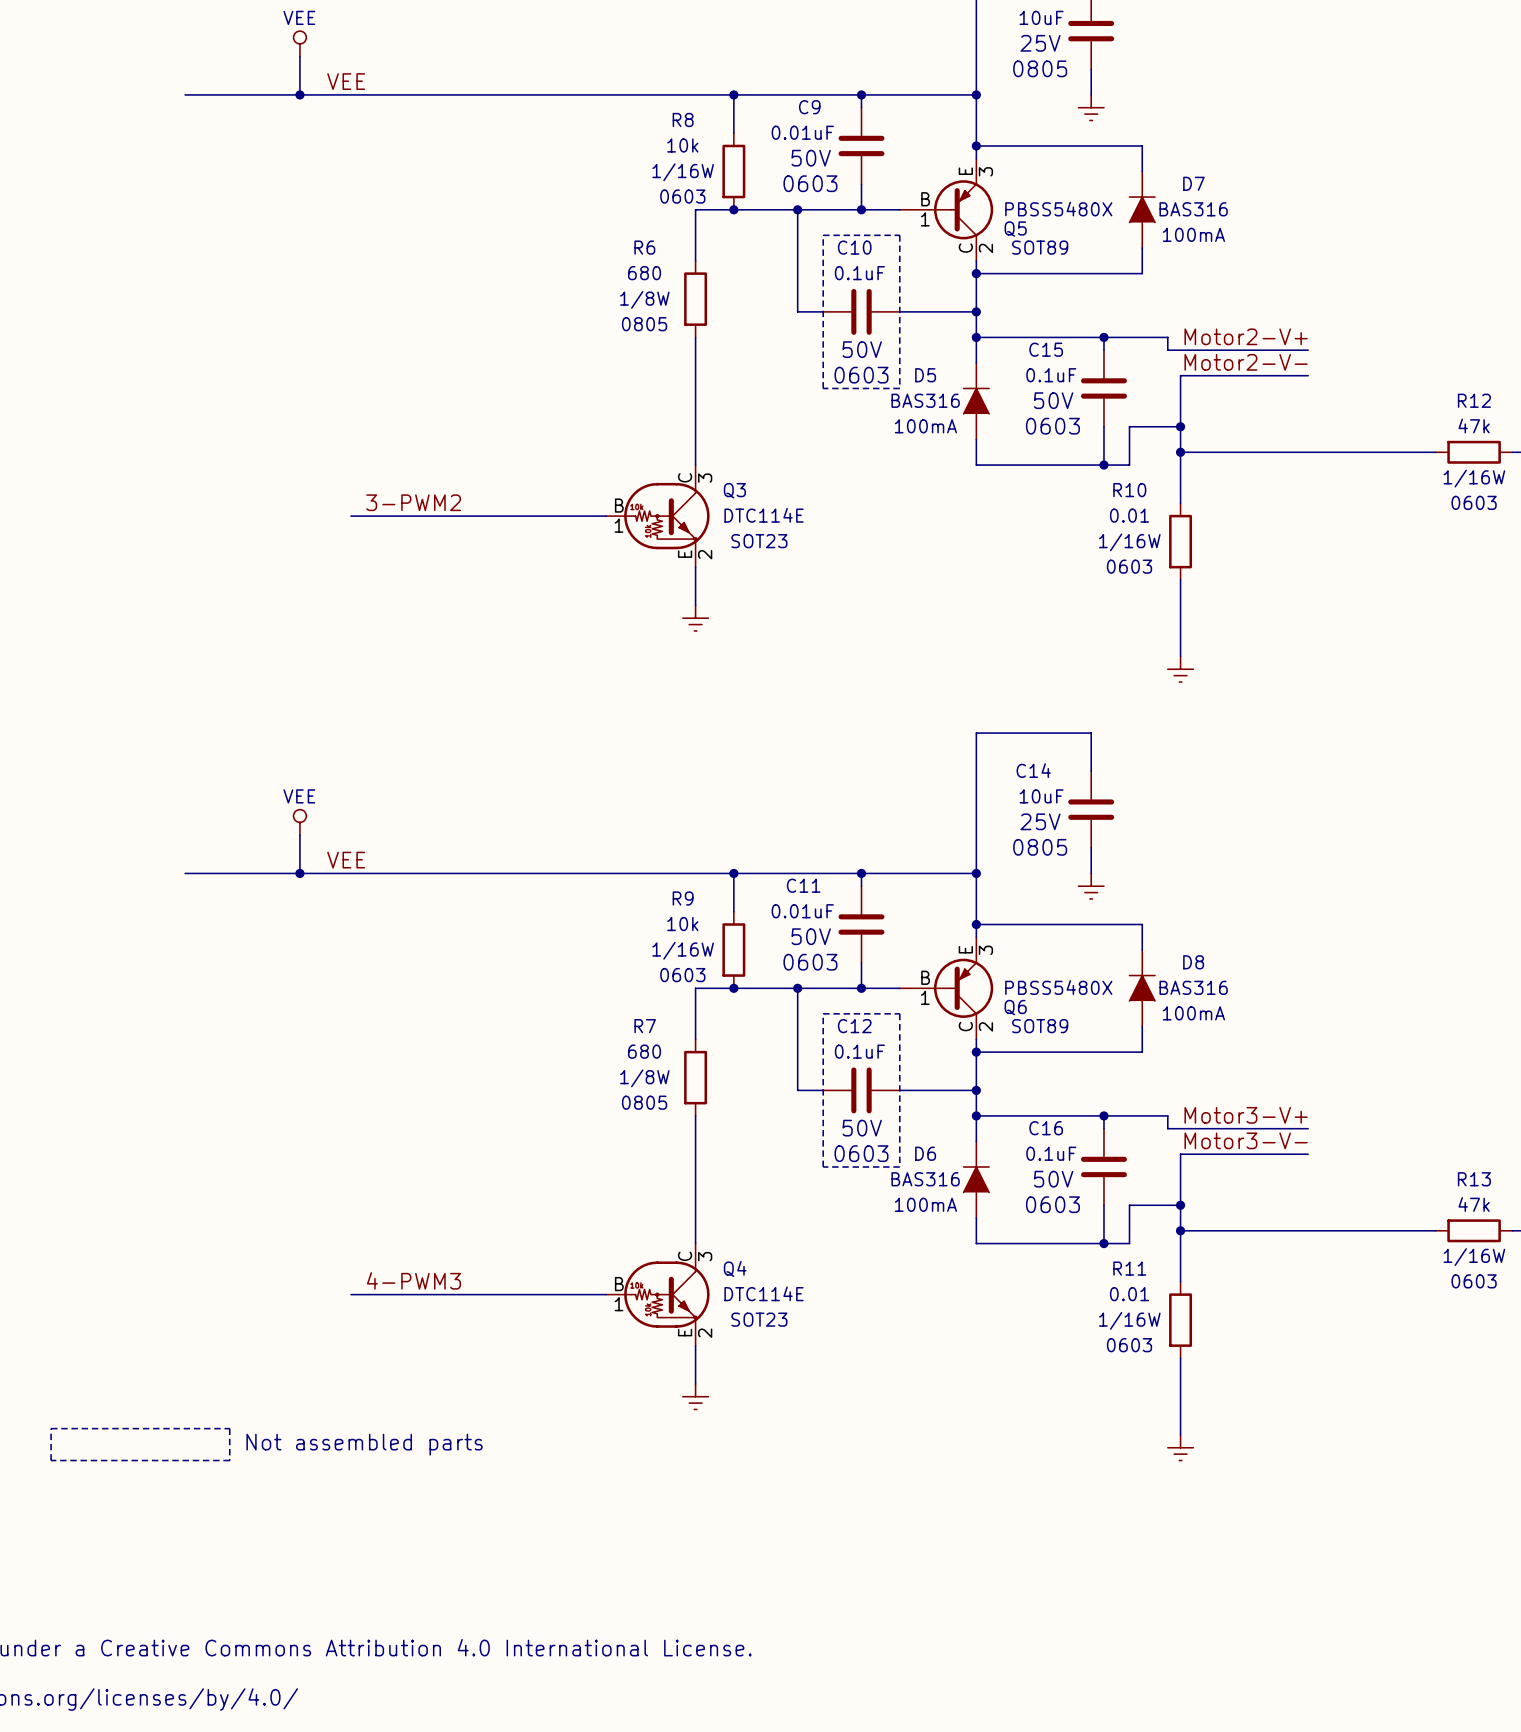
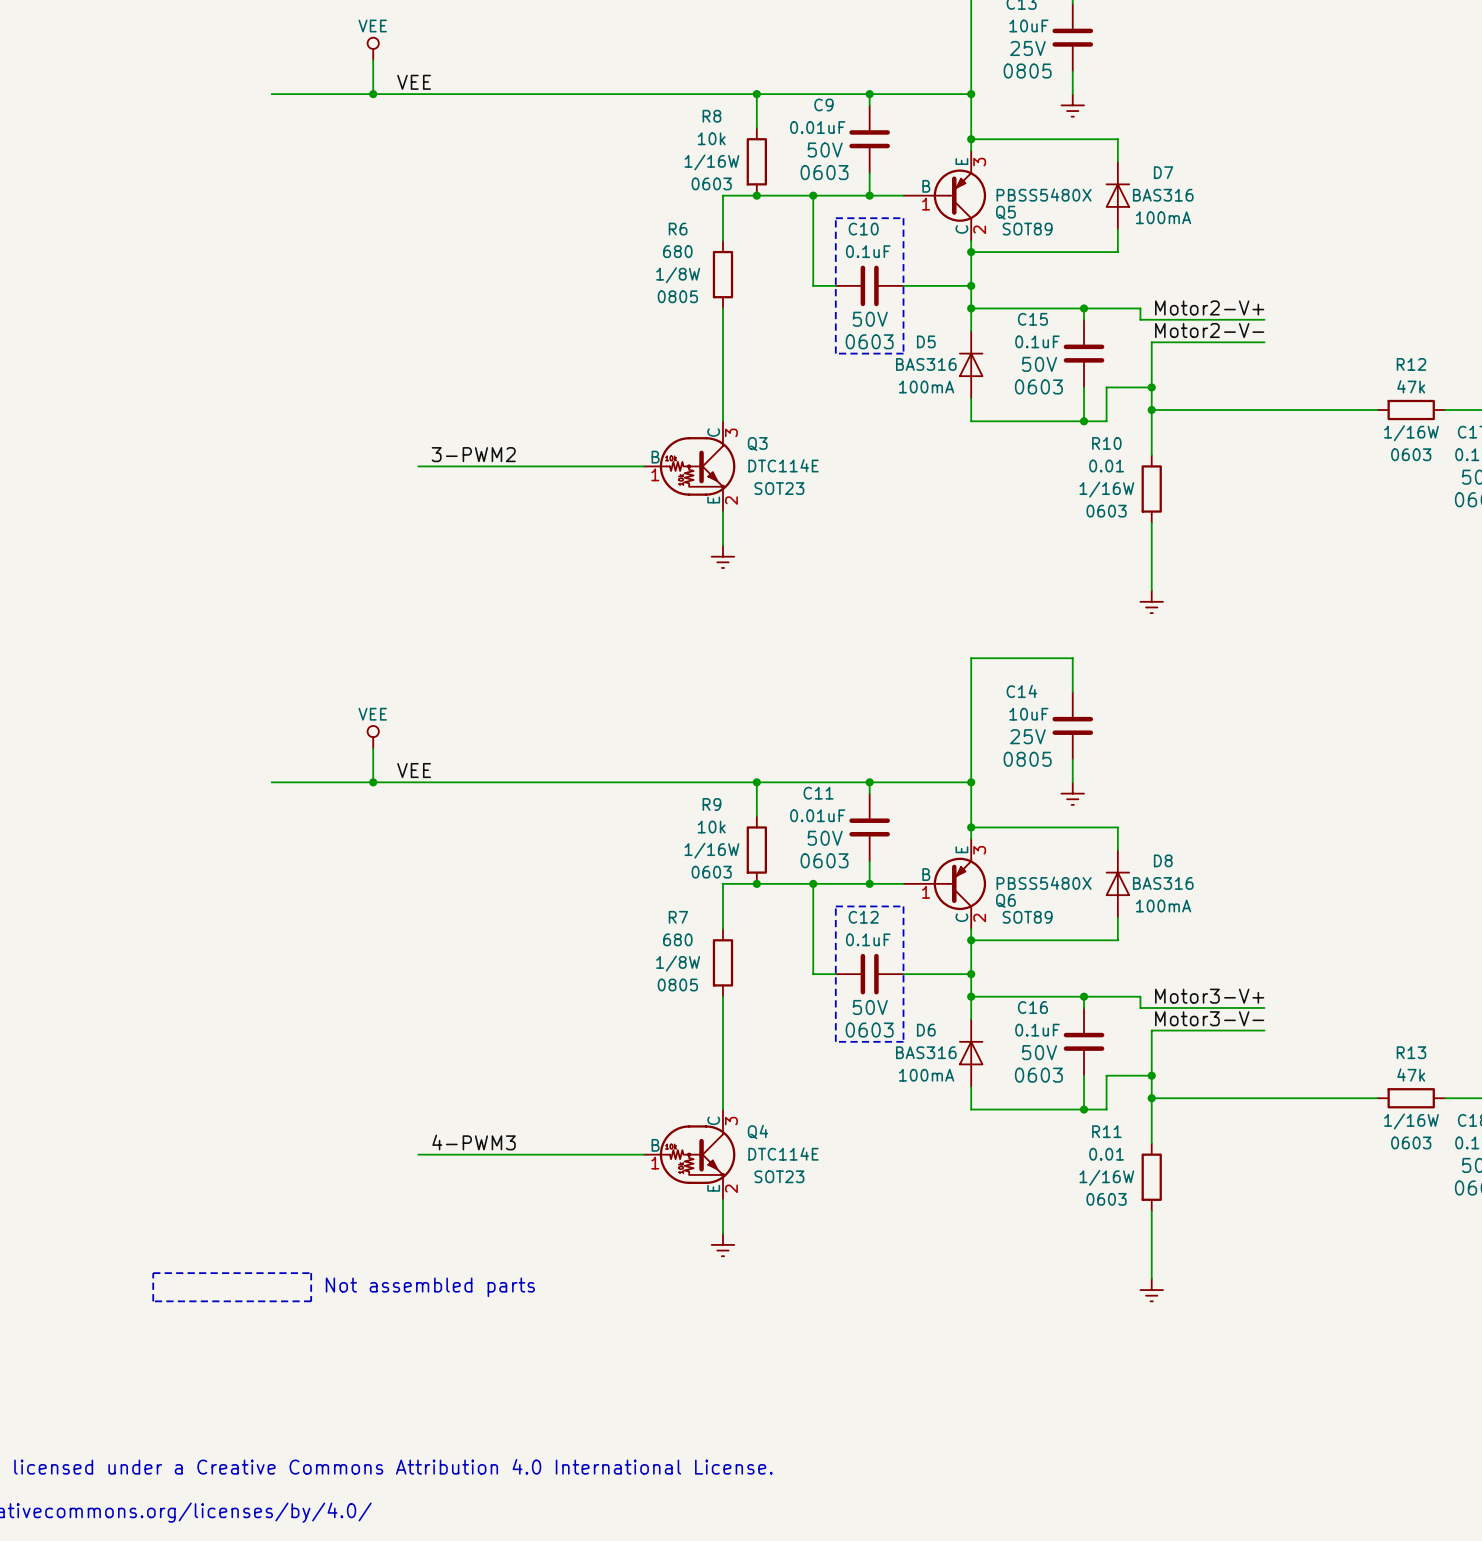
D7 symbol: [1128, 171, 1156, 249] -> [1105, 161, 1131, 230]
D5 symbol: [962, 362, 990, 440] -> [959, 331, 984, 399]
D8 symbol: [1128, 950, 1156, 1027] -> [1105, 850, 1131, 918]
D6 symbol: [962, 1141, 990, 1219] -> [959, 1019, 984, 1087]

